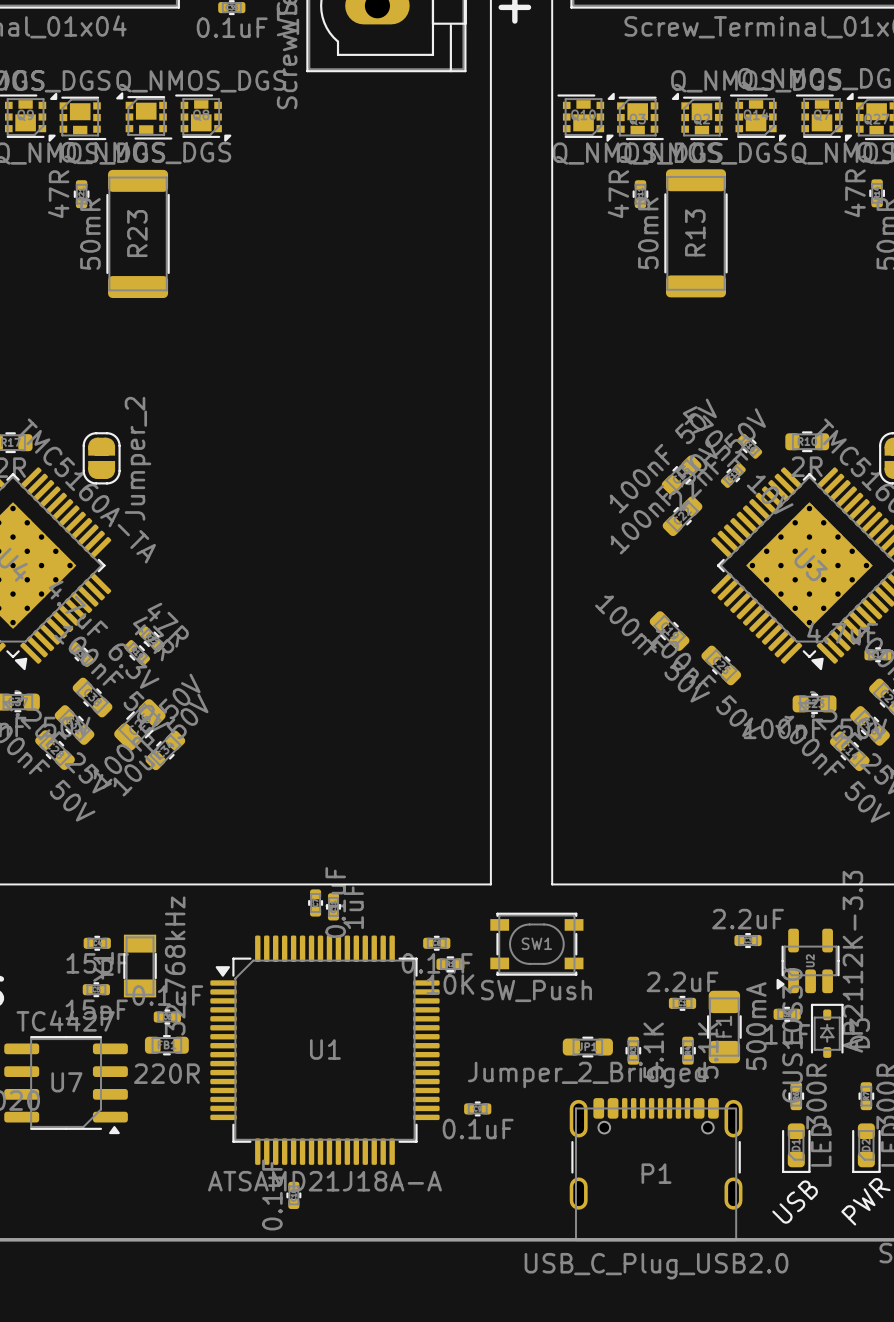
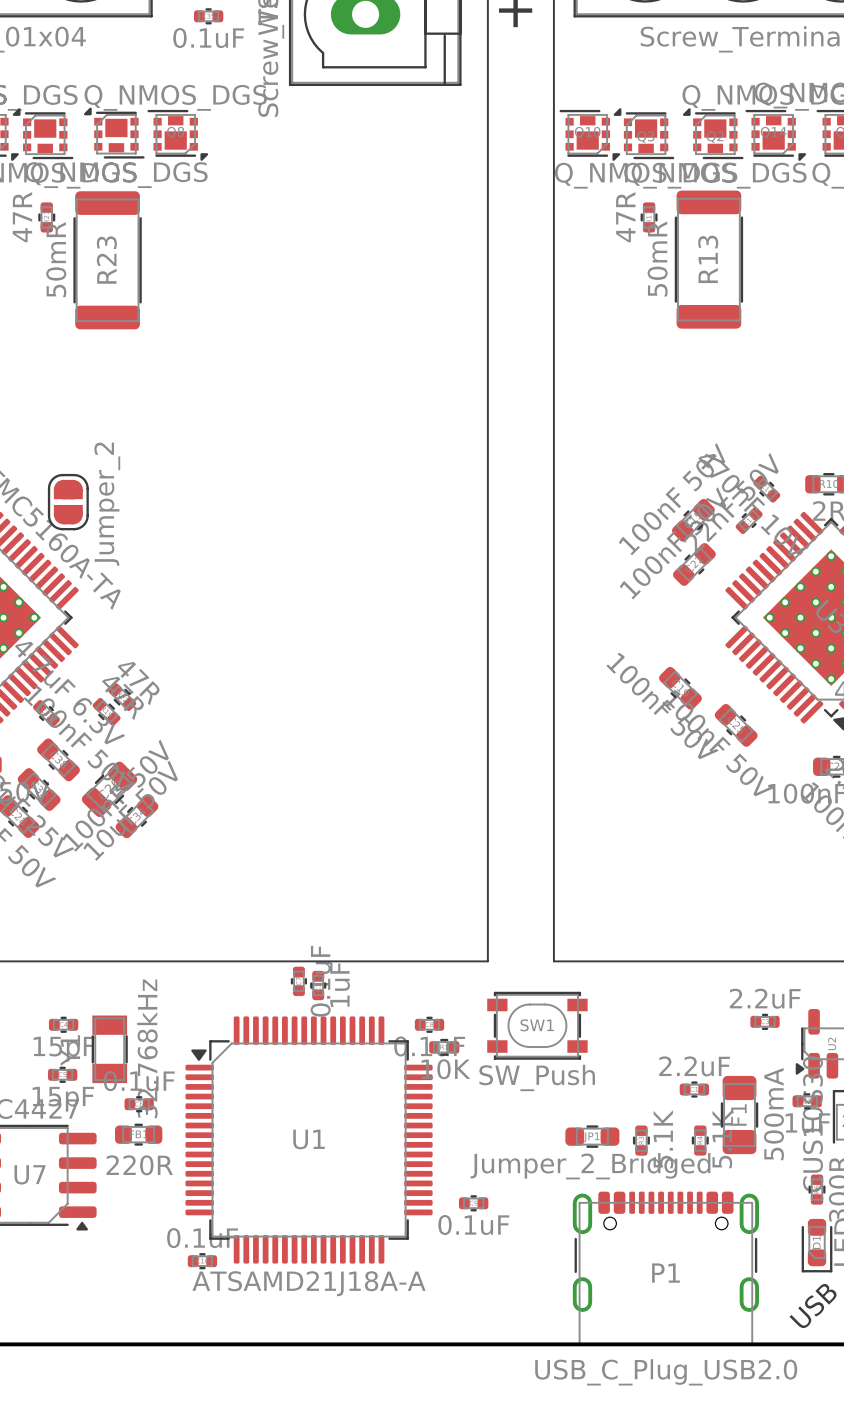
part rotation: 0° (293, 1195) -> 90° clockwise (202, 1261)
part position: (293, 1195) -> (202, 1261)

